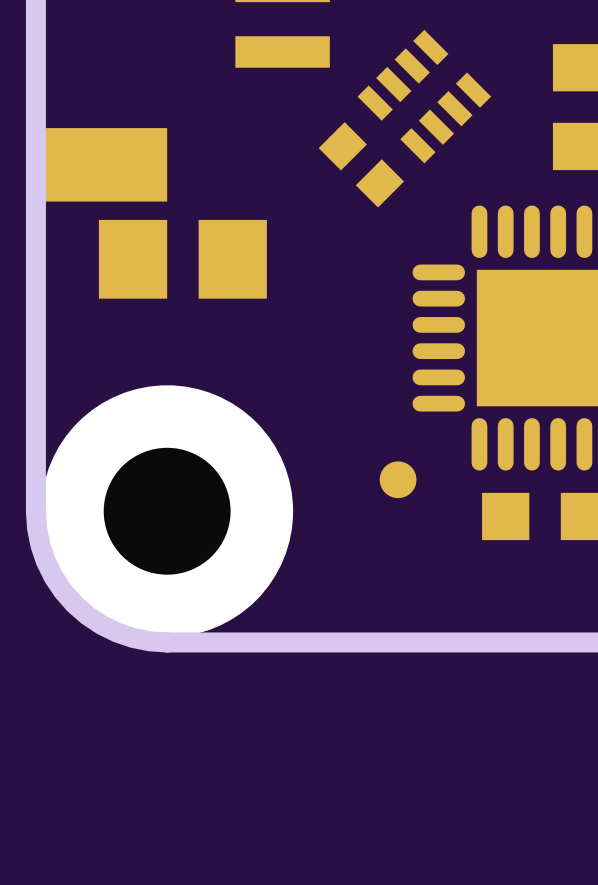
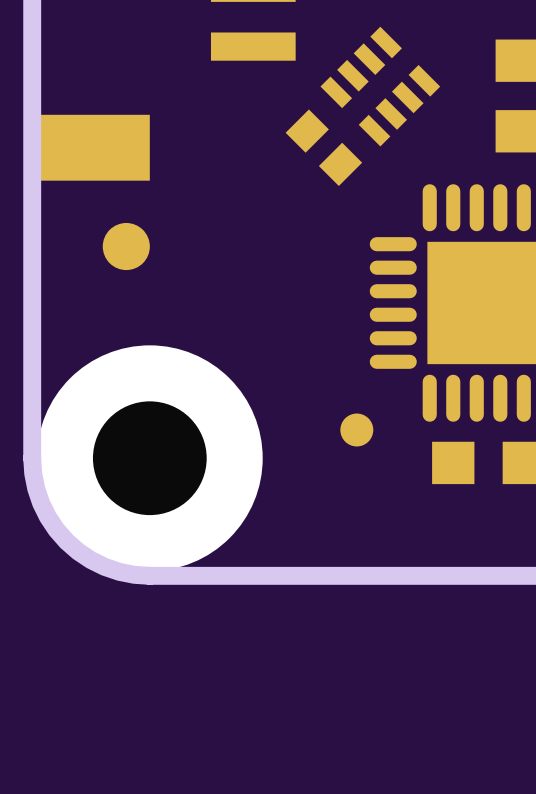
part footprint: [98, 219, 267, 299] -> [102, 222, 150, 271]

